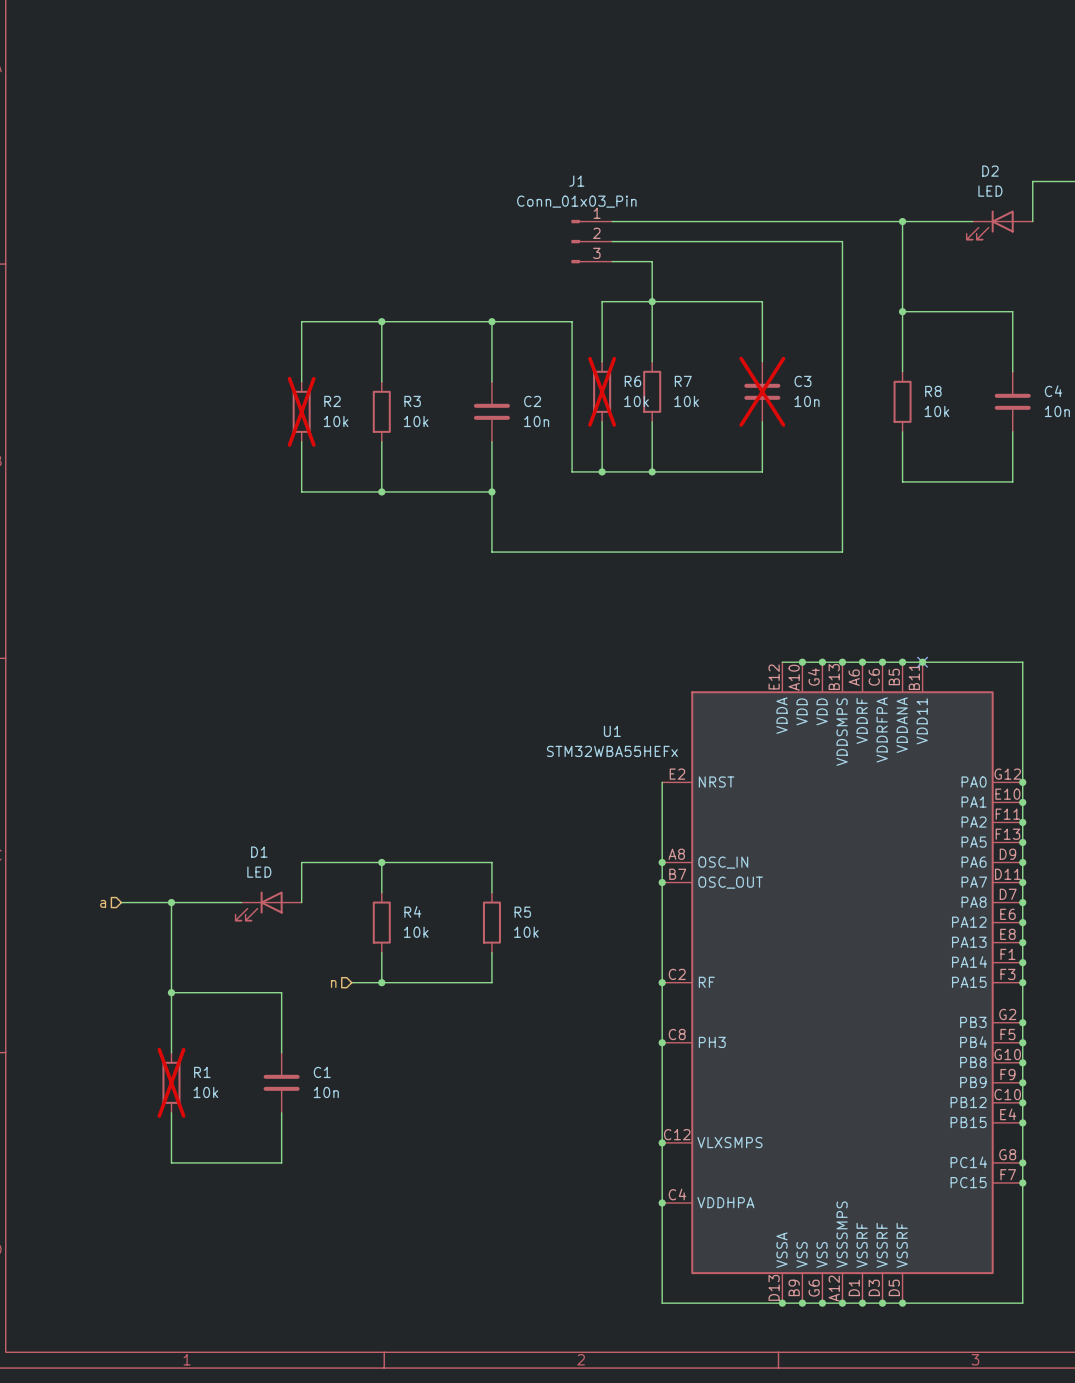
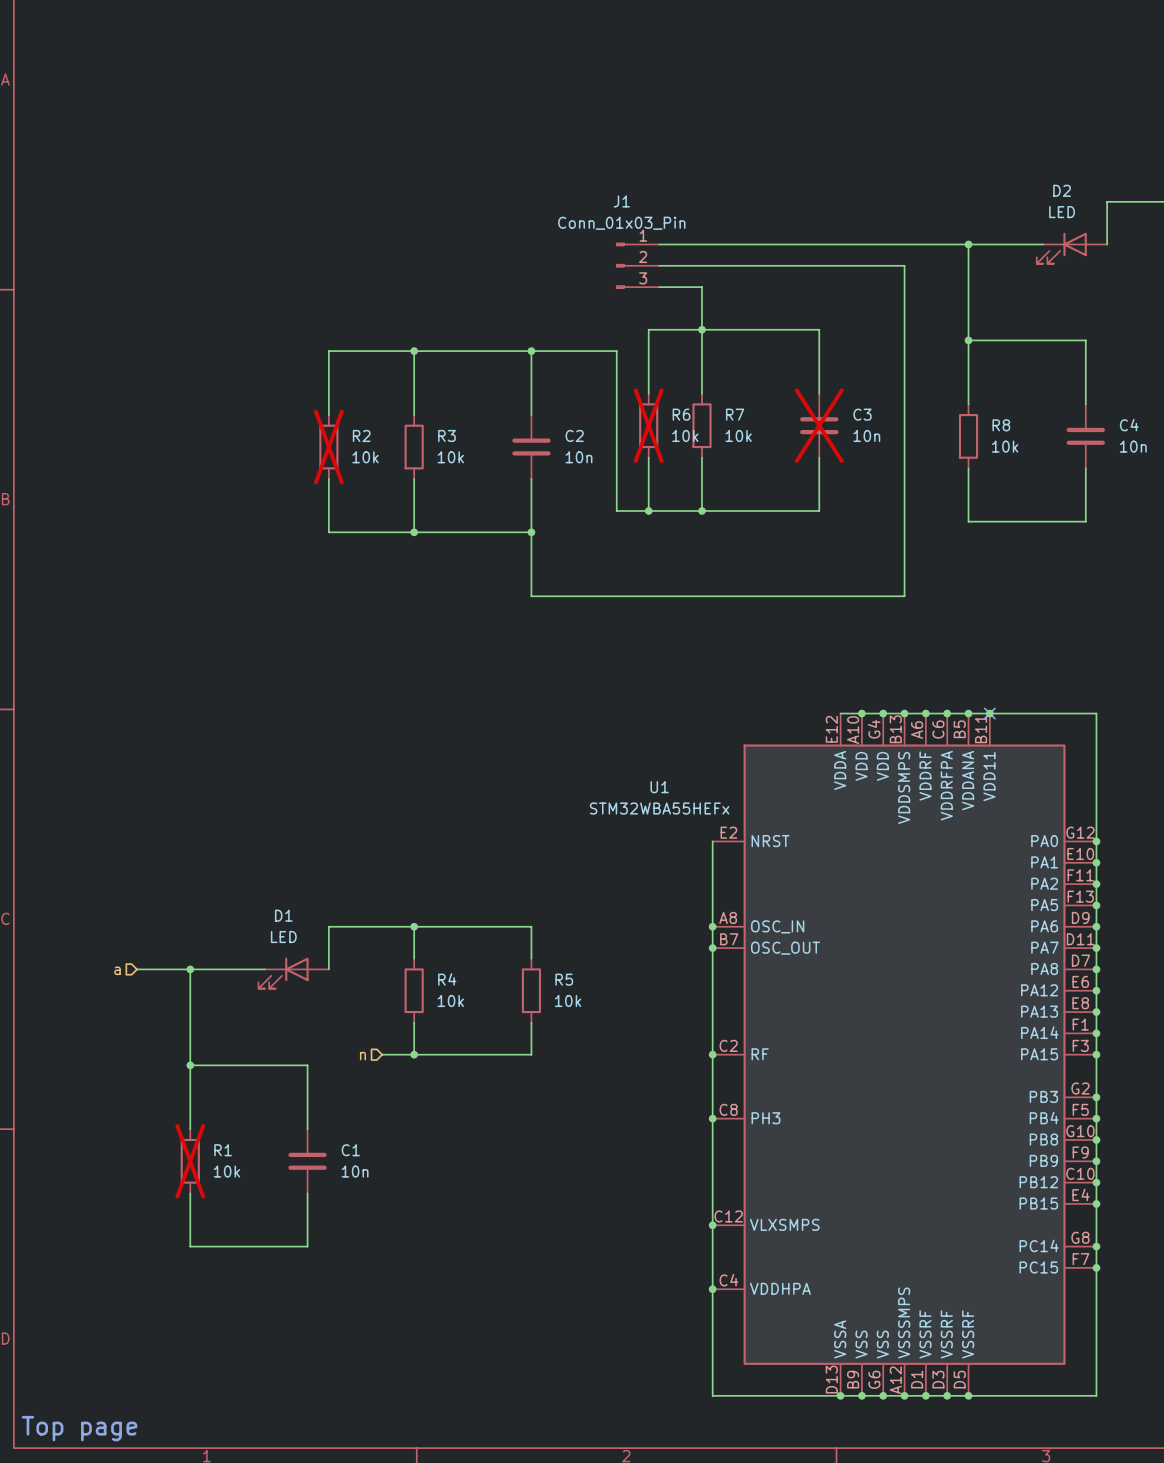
text: none -> Top page (79, 1428)

